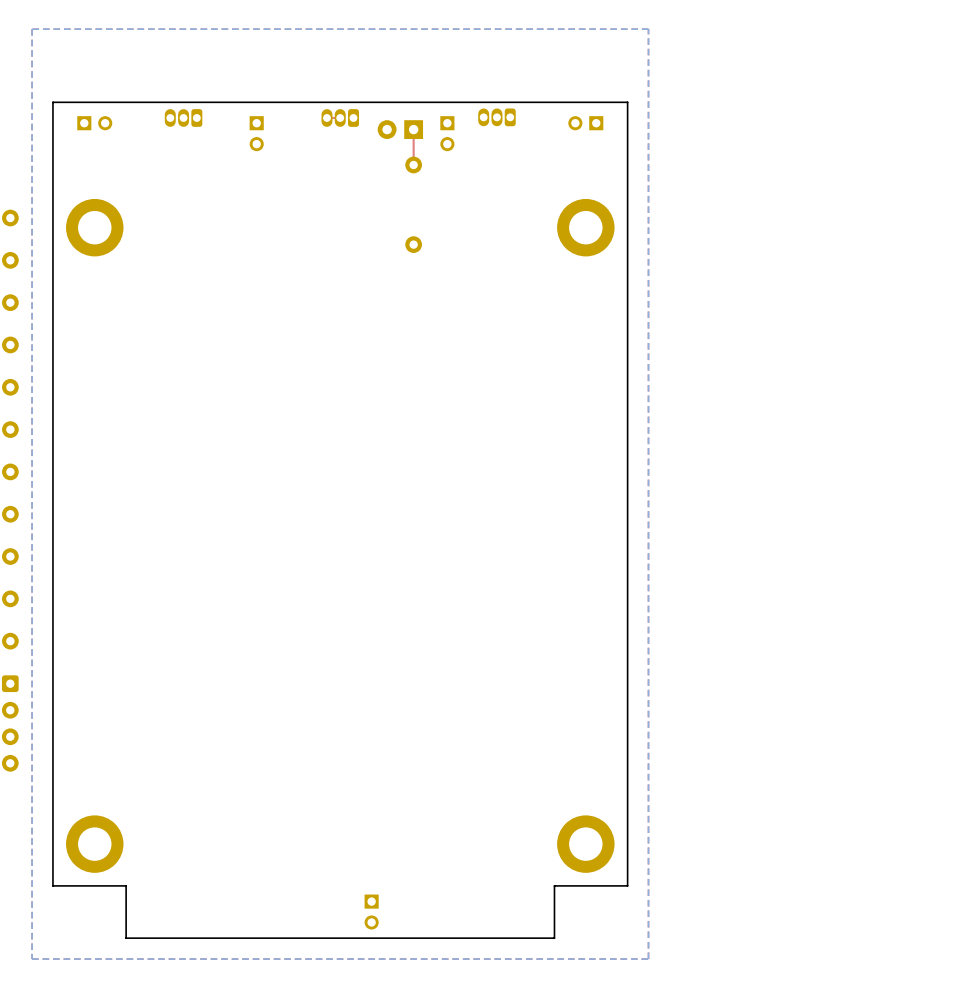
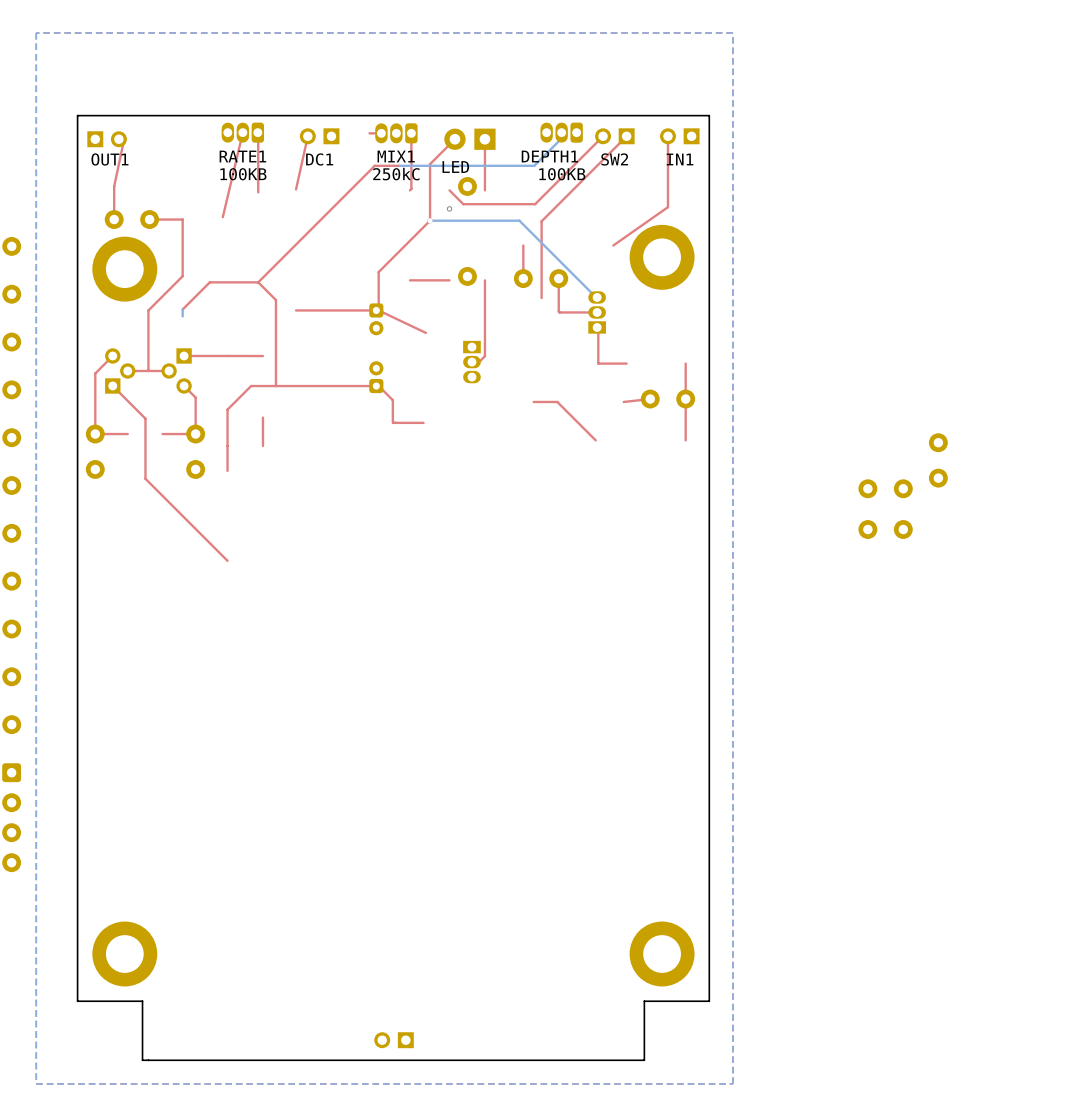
board edge: (68, 102) (52, 102) (52, 885) (68, 885) -> (77, 115) (77, 1001)
part: (183, 117) -> none
top track: none -> (242, 132) (222, 217)
part: none -> 100KB (242, 132)
top track: none -> (257, 132) (258, 192)
part: (340, 117) -> none
part: none -> 250kC (396, 133)
top track: none -> (411, 133) (409, 190)
bottom track: none -> (564, 132) (564, 135) (534, 165) (399, 165)
top track: none -> (124, 136) (114, 186) (114, 219)
top track: none -> (307, 136) (296, 189)
top track: none -> (603, 136) (535, 204) (463, 204) (449, 190)
part: none -> (614, 136)
top track: none -> (626, 136) (541, 221) (541, 298)
top track: none -> (667, 136) (667, 207) (613, 245)
top track: none -> (454, 139) (430, 164) (430, 220) (378, 272) (378, 310)
part: none -> LED (469, 139)
part position: (585, 123) -> (679, 136)
part: (400, 129) -> none
top track: (413, 129) (413, 165) -> none
top track: none -> (484, 146) (484, 190)
part rotation: 0° (256, 133) -> 90° clockwise (319, 136)
part position: (256, 133) -> (319, 136)
part: (447, 133) -> none
text: none -> RATE1 (242, 156)
text: none -> MIX1 (396, 156)
text: none -> DEPTH1 (549, 156)
text: none -> OUT1 (109, 159)
text: none -> DC1 (319, 159)
text: none -> SW2 (614, 159)
text: none -> IN1 (680, 159)
top track: none -> (399, 165) (374, 165) (258, 282)
part value: none -> 100KB (562, 174)
via: none -> (449, 208)
part: none -> (131, 219)
top track: none -> (149, 219) (182, 219) (182, 276) (148, 310) (148, 370)
bottom track: none -> (430, 220) (519, 220) (597, 298)
via: none -> (430, 220)
top track: none -> (523, 245) (523, 278)
part position: (94, 227) -> (124, 269)
part: none -> (541, 278)
top track: none -> (558, 278) (559, 312) (597, 312)
top track: none -> (449, 280) (409, 280)
top track: none -> (484, 280) (484, 356) (479, 362) (471, 362)
top track: none -> (258, 282) (275, 300) (275, 386)
top track: none -> (258, 282) (209, 282) (182, 309)
bottom track: none -> (182, 309) (182, 316)
top track: none -> (378, 310) (425, 332)
top track: none -> (378, 310) (296, 310)
part: none -> (597, 312)
part: none -> (376, 319)
top track: none -> (597, 327) (598, 363) (626, 363)
top track: none -> (112, 355) (95, 373) (95, 434) (127, 434)
top track: none -> (262, 356) (184, 355)
part: none -> (471, 362)
top track: none -> (685, 363) (685, 440)
part: none -> (120, 370)
top track: none -> (169, 370) (127, 370)
part: none -> (176, 370)
part: none -> (376, 377)
top track: none -> (112, 385) (145, 418) (145, 478) (227, 560)
top track: none -> (184, 385) (195, 397) (195, 434) (162, 434)
top track: none -> (378, 386) (392, 400) (392, 422)
top track: none -> (381, 386) (251, 386) (227, 409) (227, 470)
top track: none -> (647, 399) (650, 399) (623, 401)
part: none -> (667, 399)
top track: none -> (533, 401) (557, 401) (595, 440)
top track: none -> (262, 417) (262, 445)
top track: none -> (423, 422) (393, 422)
part: none -> (95, 451)
part: none -> (195, 451)
part: none -> (938, 460)
part: none -> (885, 488)
part: none -> (885, 529)
part position: (94, 844) -> (124, 954)
board edge: (570, 885) (554, 885) (554, 938) -> (644, 1001) (644, 1060) (626, 1060)
part rotation: 0° (371, 912) -> 90° clockwise (394, 1040)
part position: (371, 912) -> (394, 1040)

